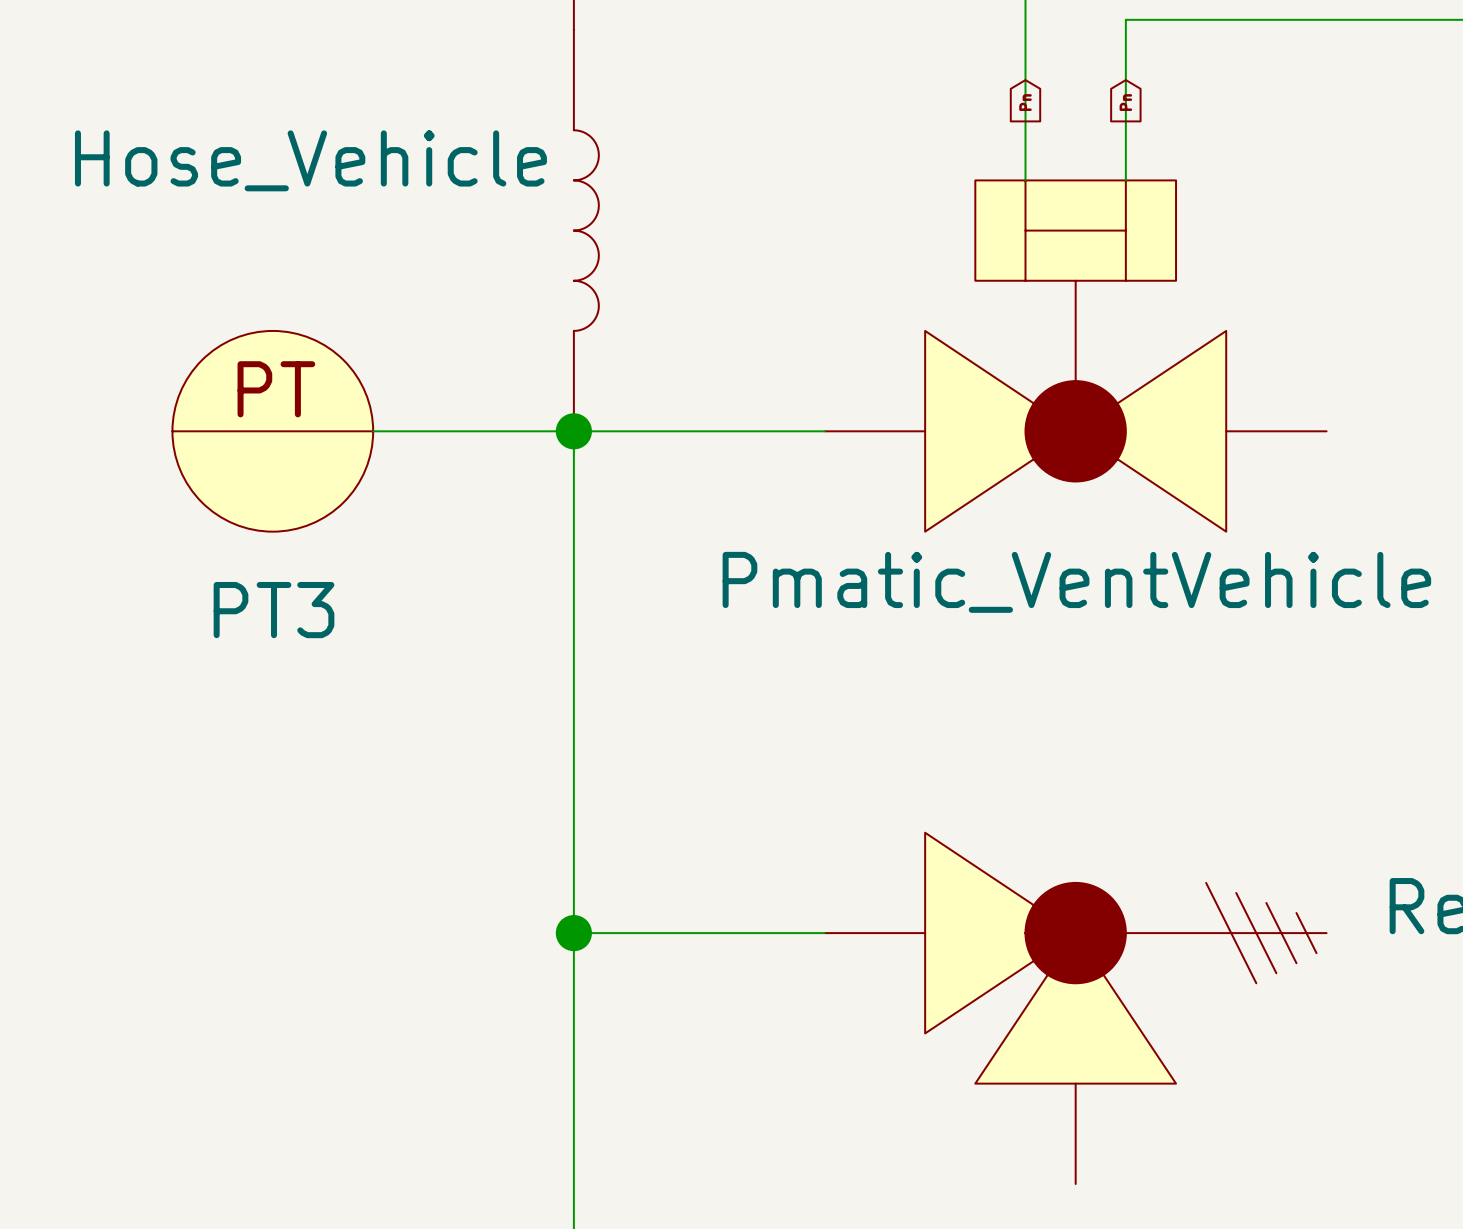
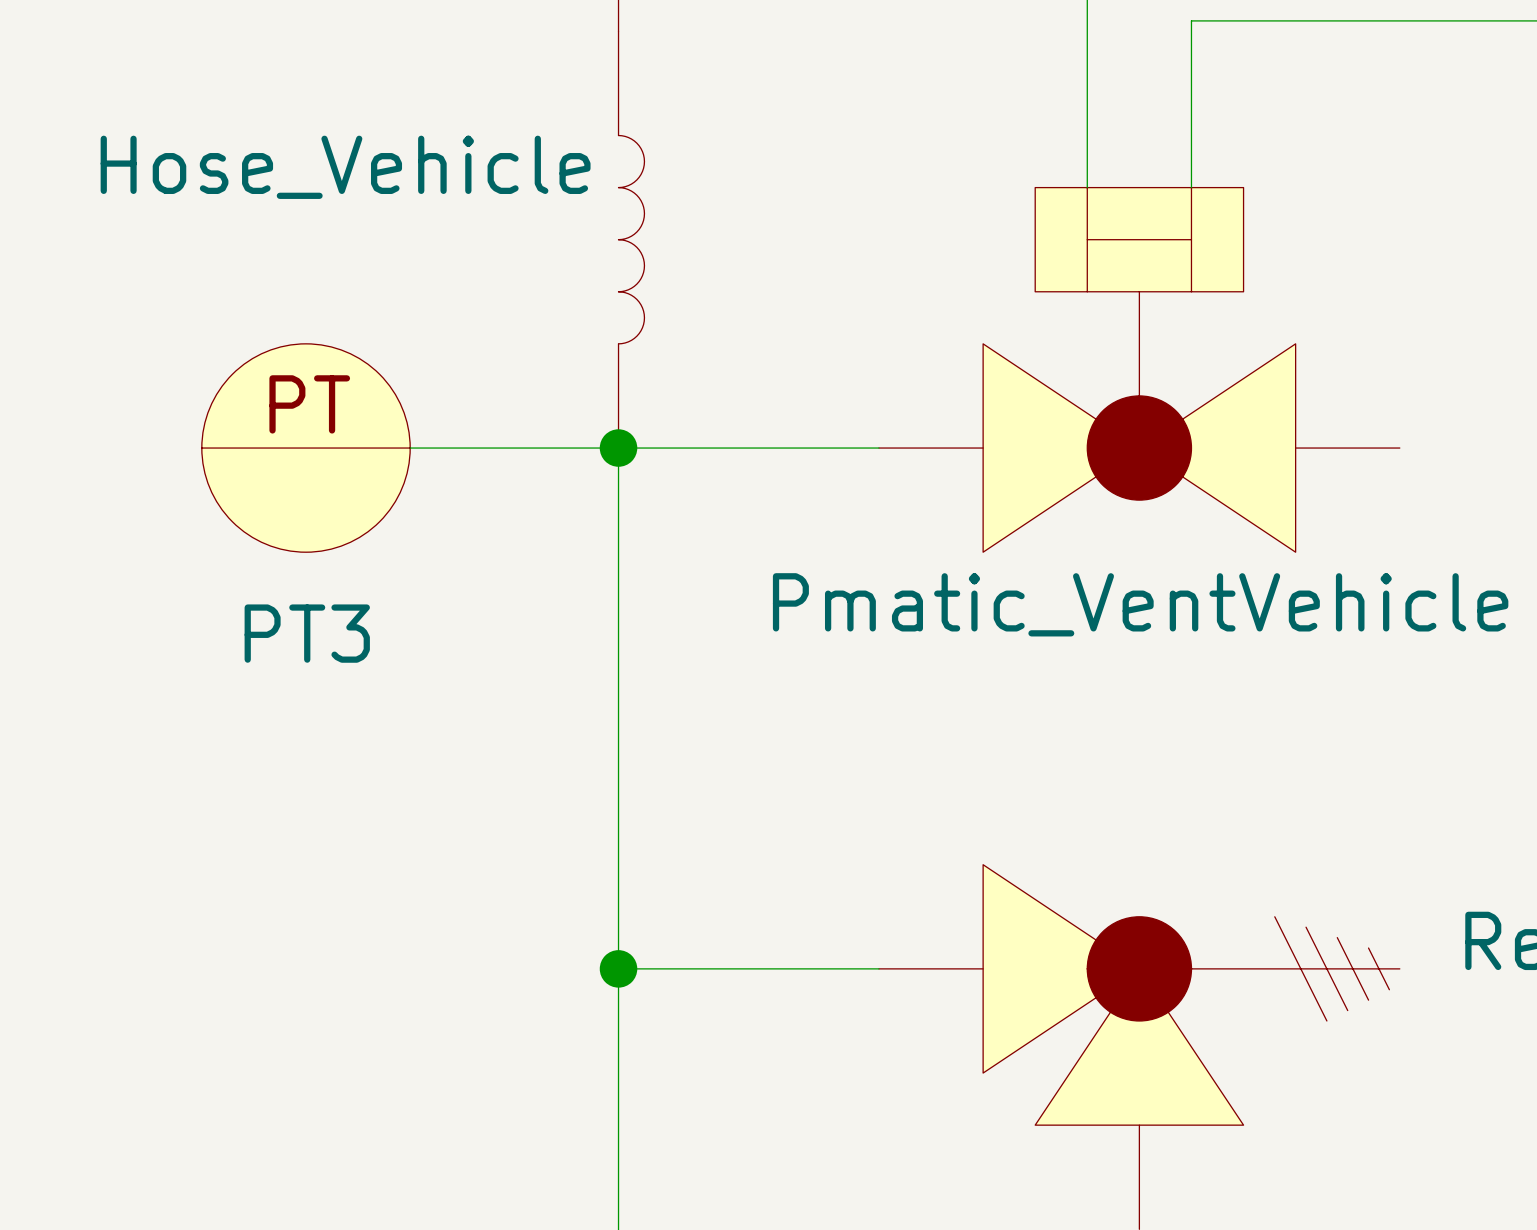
global label: Pn (1025, 102) -> none
global label: Pn (1125, 102) -> none

